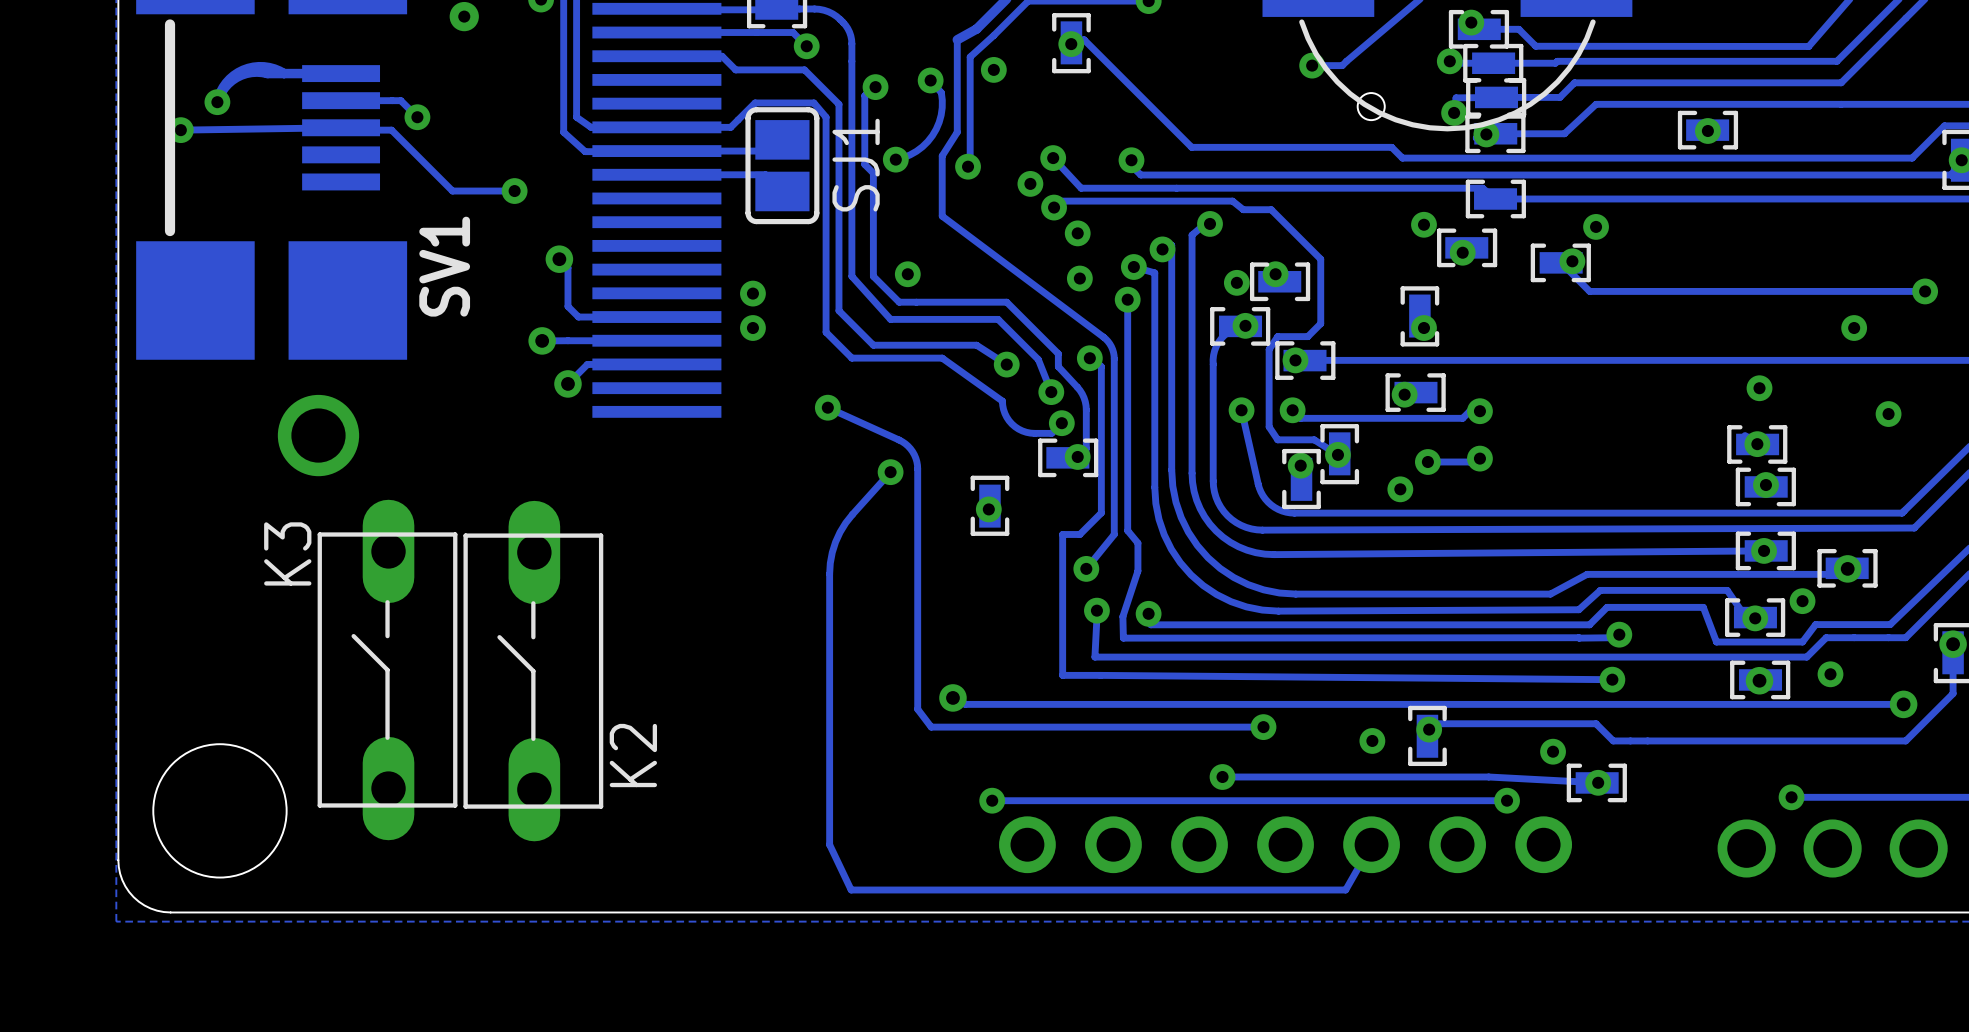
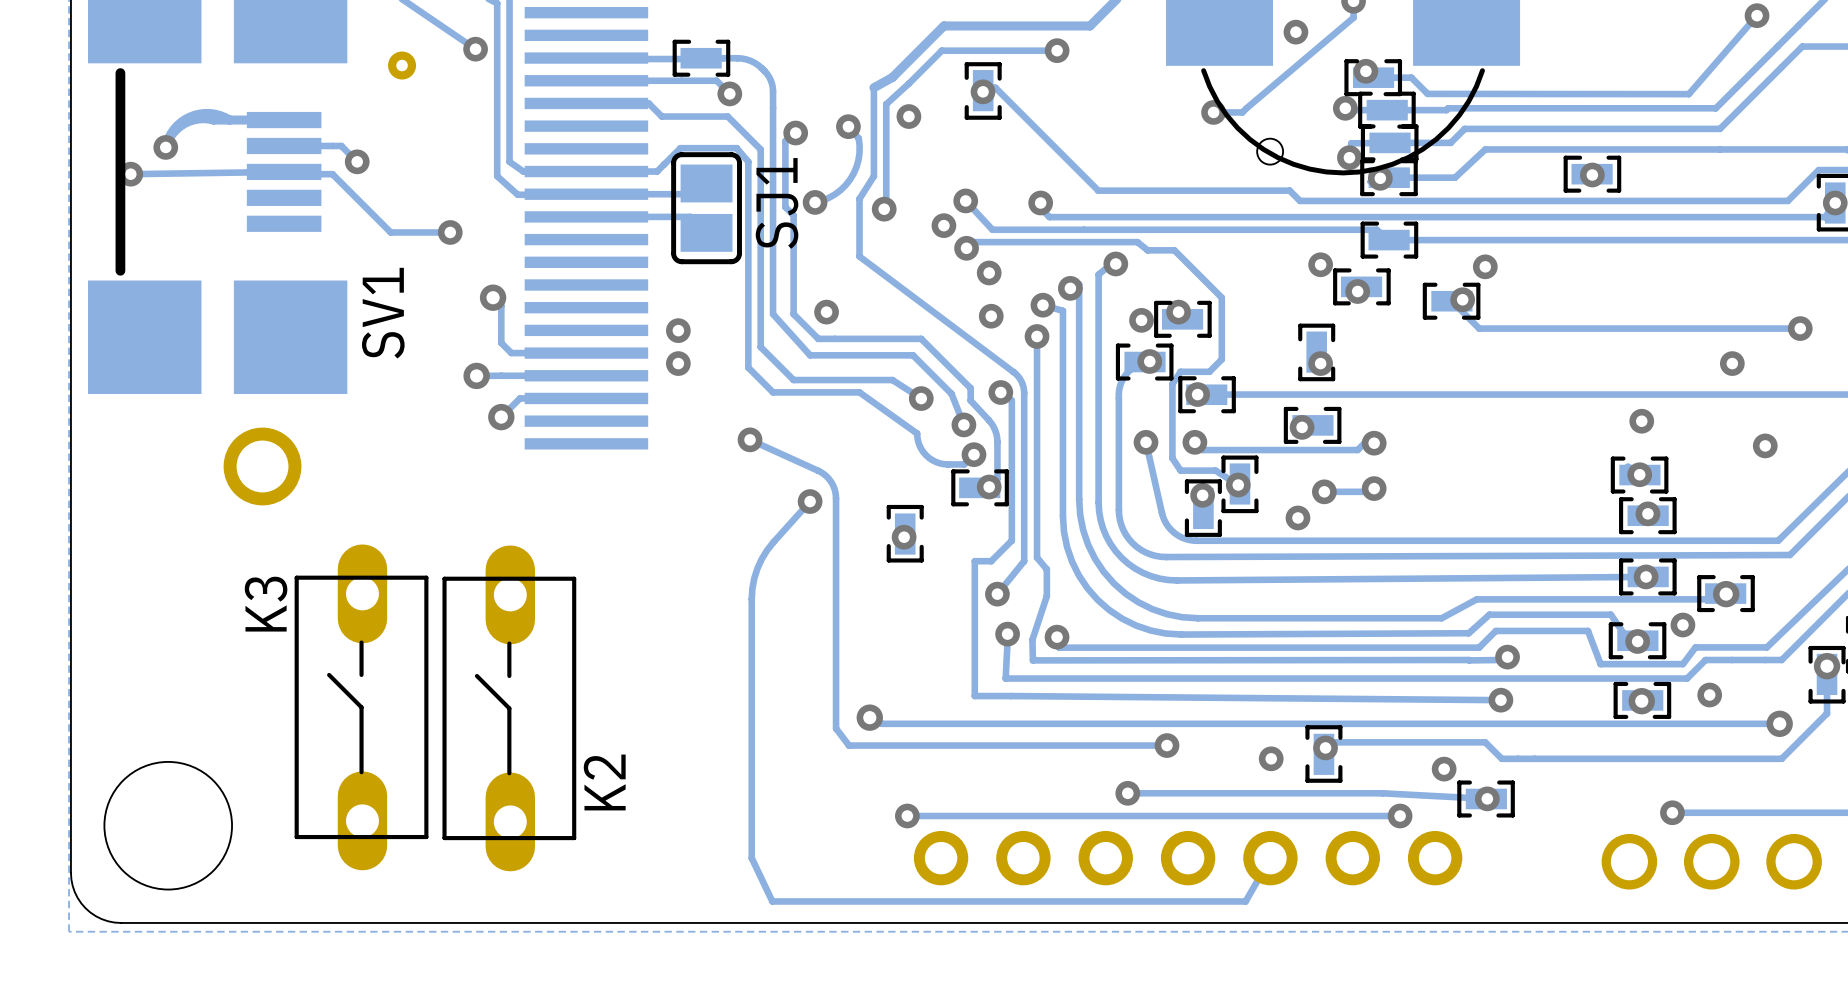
K3 position: (387, 670) -> (361, 707)
K2 position: (533, 671) -> (509, 708)

